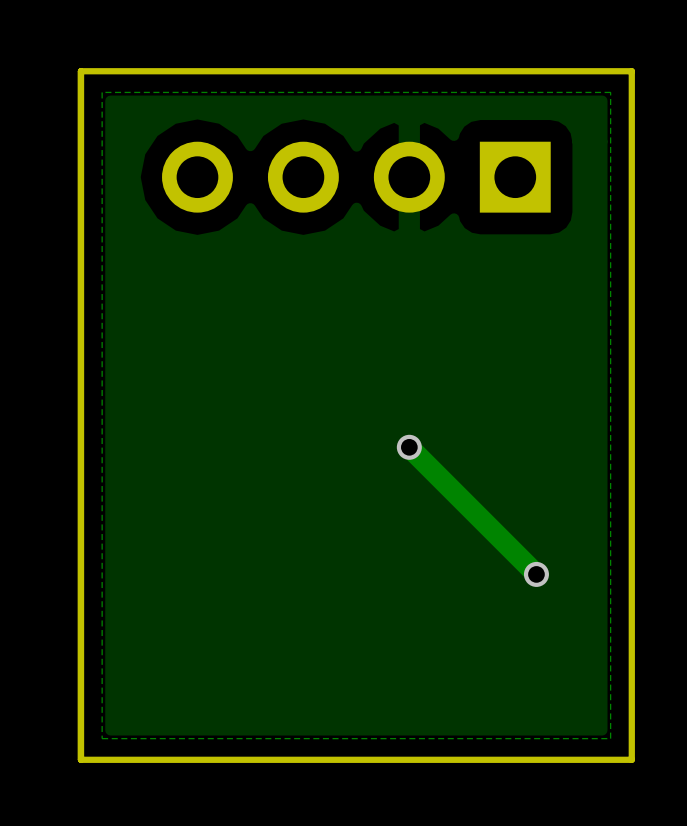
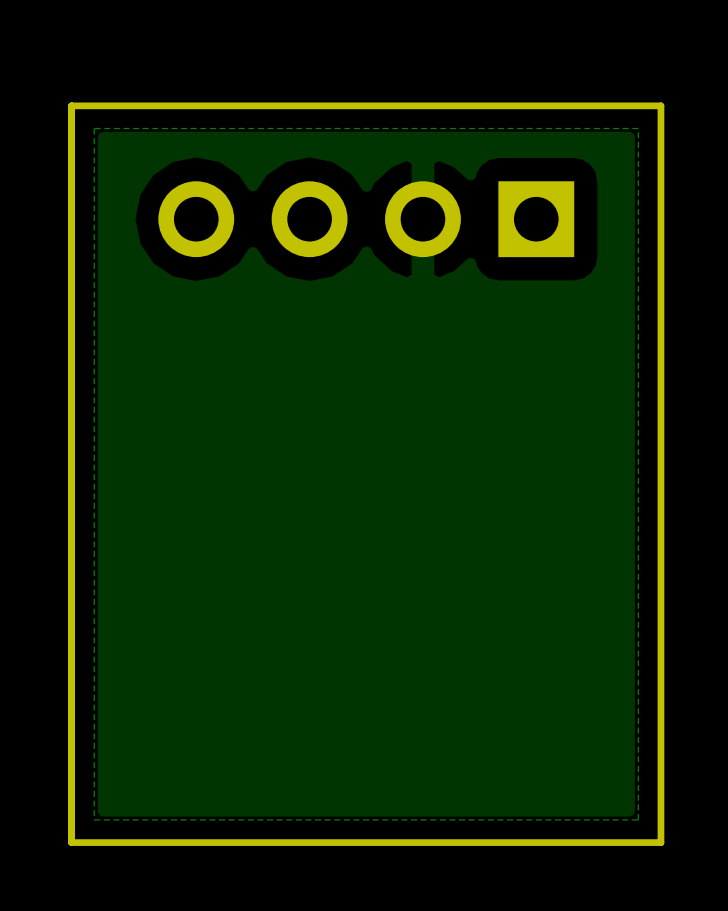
track: (409, 447) (536, 574) -> none
via: (409, 447) -> none
via: (536, 574) -> none

